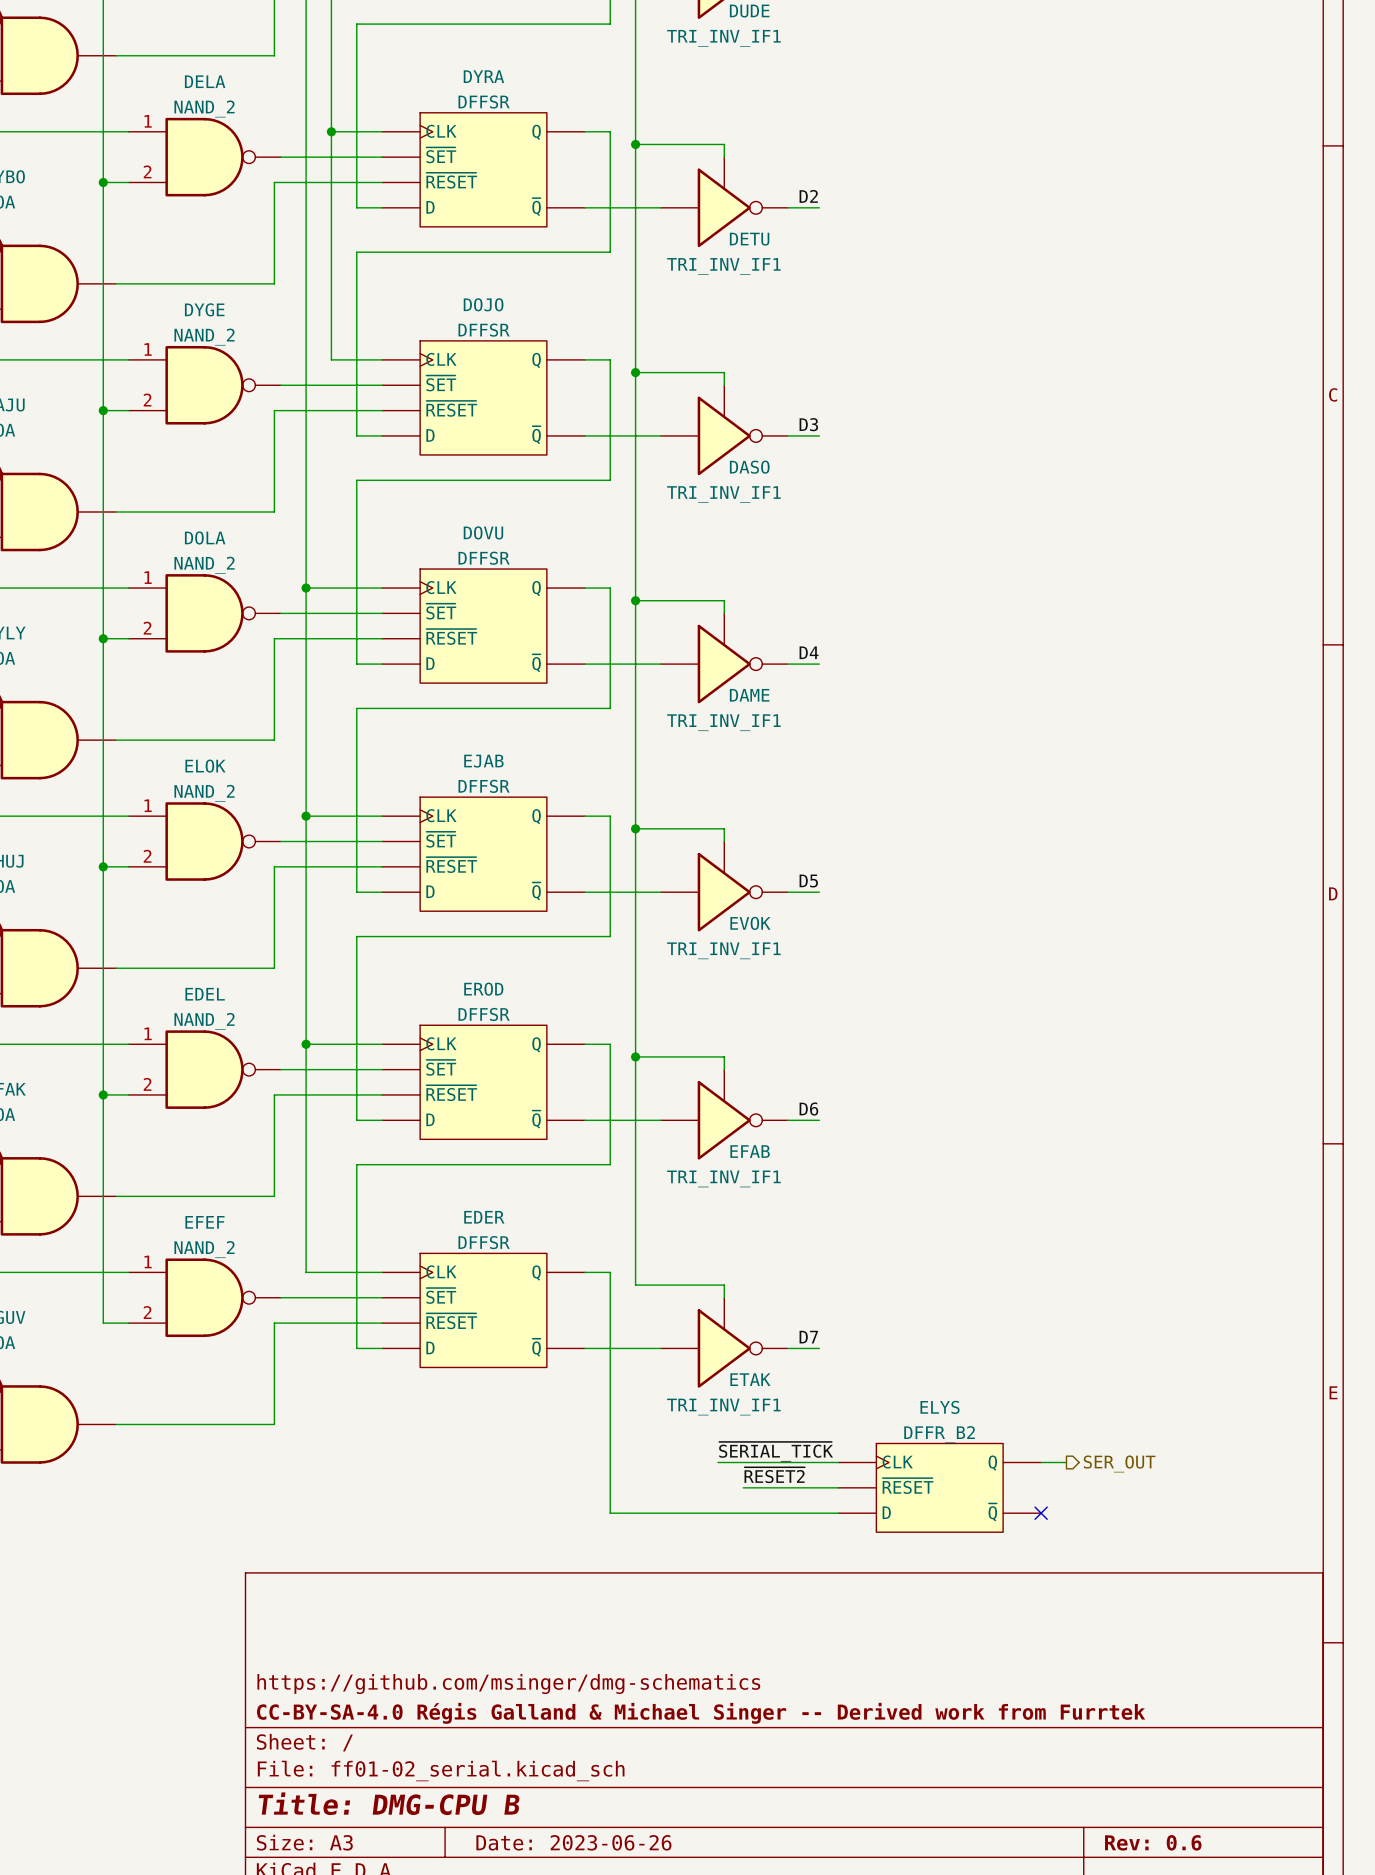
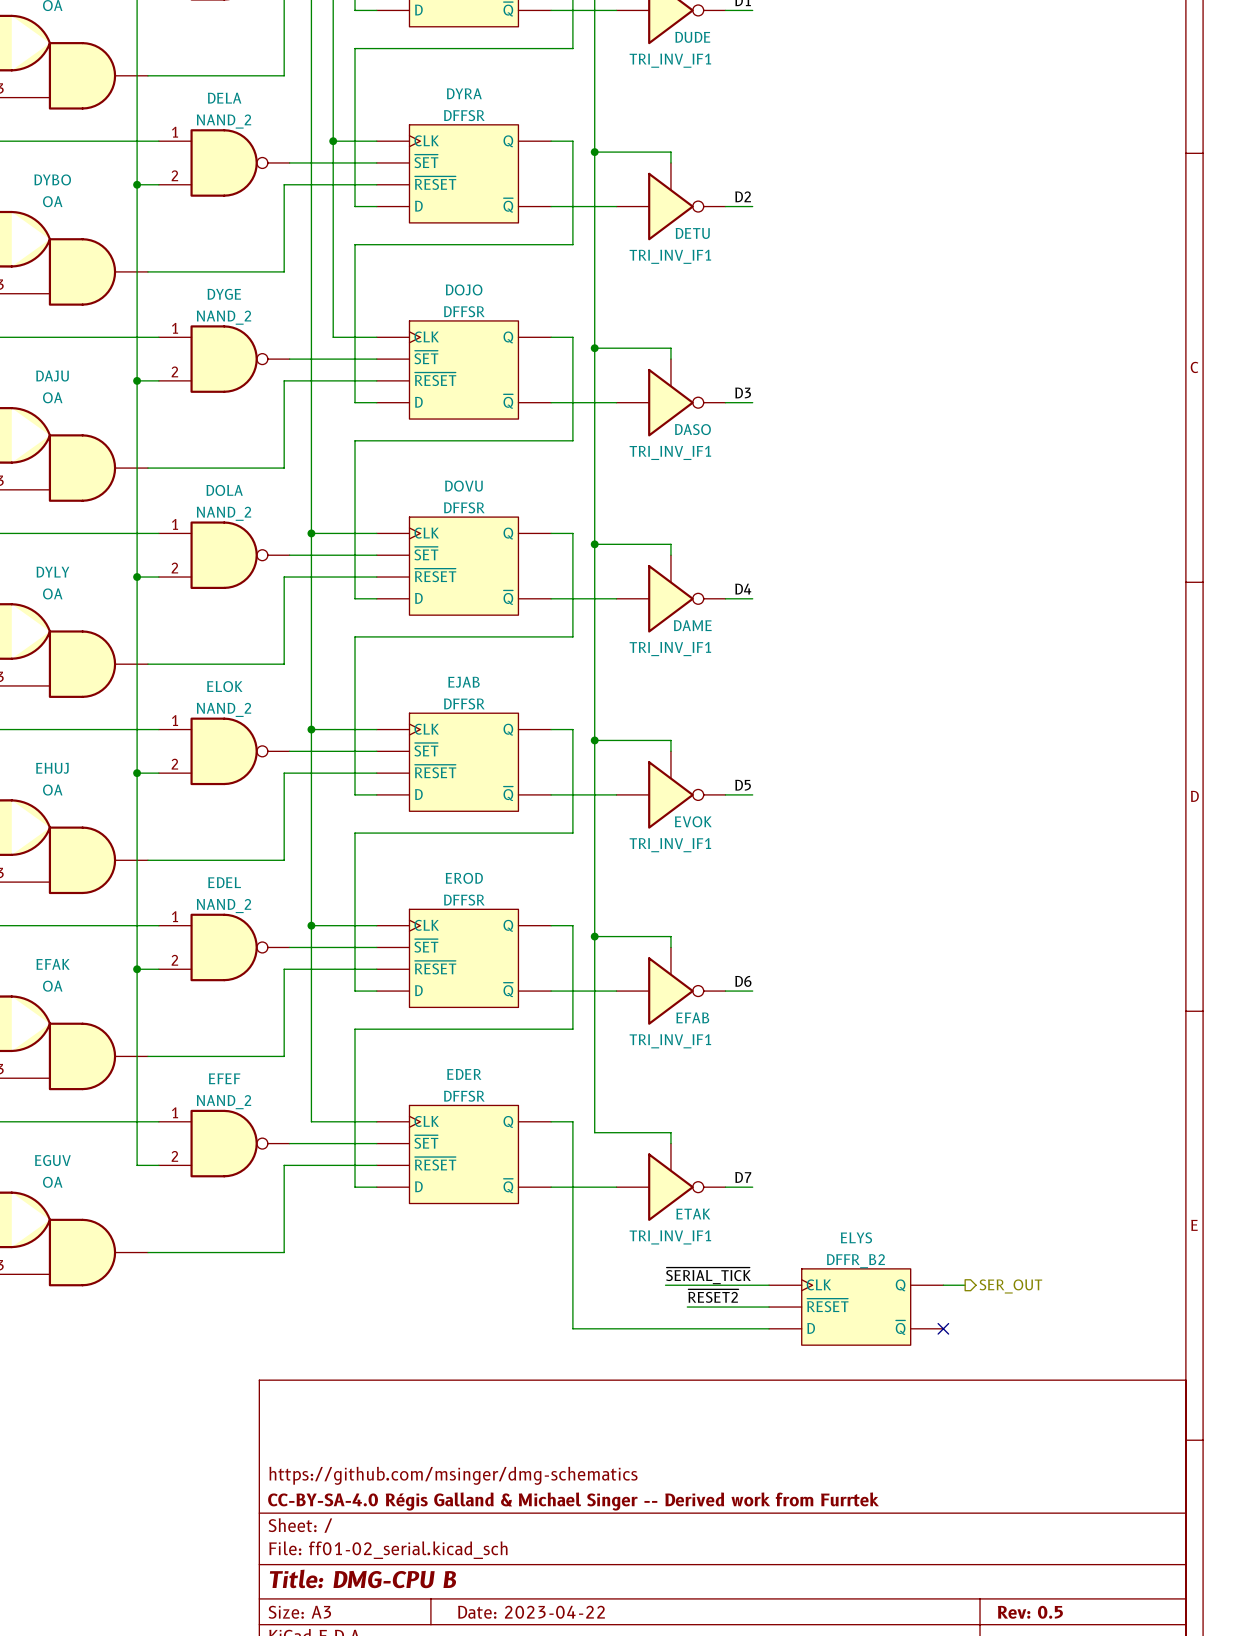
title block: Date: 2023-06-26 (573, 1842) -> Date: 2023-04-22 (531, 1612)
title block: Rev: 0.6 (1153, 1842) -> Rev: 0.5 (1030, 1612)

